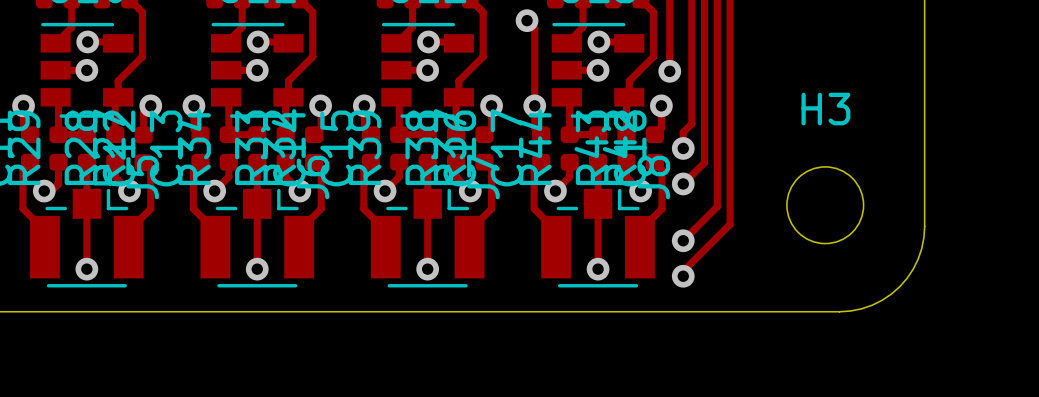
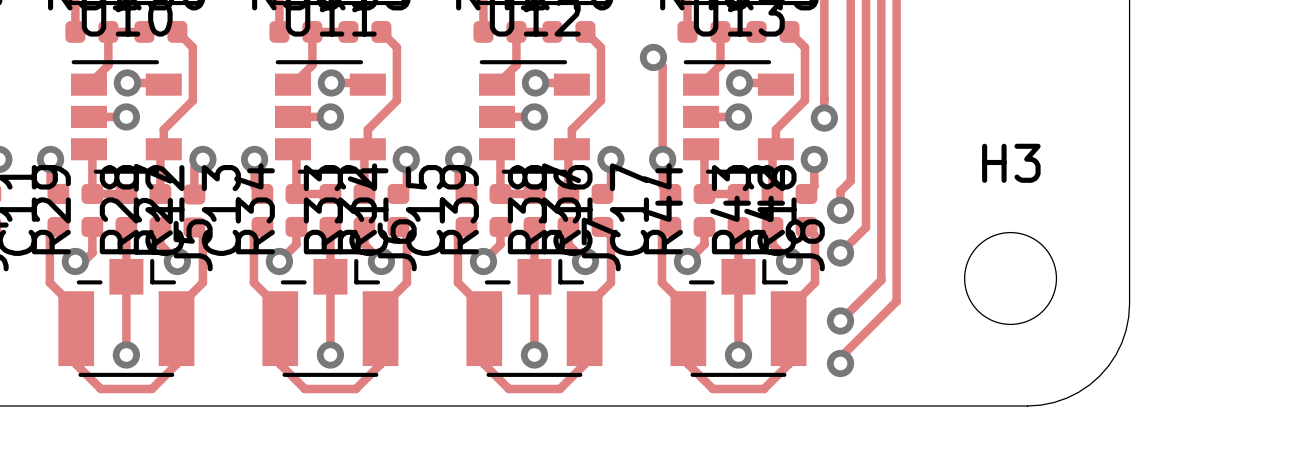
track: none -> (76, 328) (76, 364) (100, 389) (151, 389) (176, 364) (176, 328)
track: none -> (280, 328) (280, 364) (304, 389) (355, 389) (380, 364) (380, 328)
track: none -> (484, 328) (484, 364) (508, 389) (559, 389) (584, 364) (584, 328)
track: none -> (688, 328) (688, 364) (712, 389) (764, 389) (788, 364) (788, 328)

